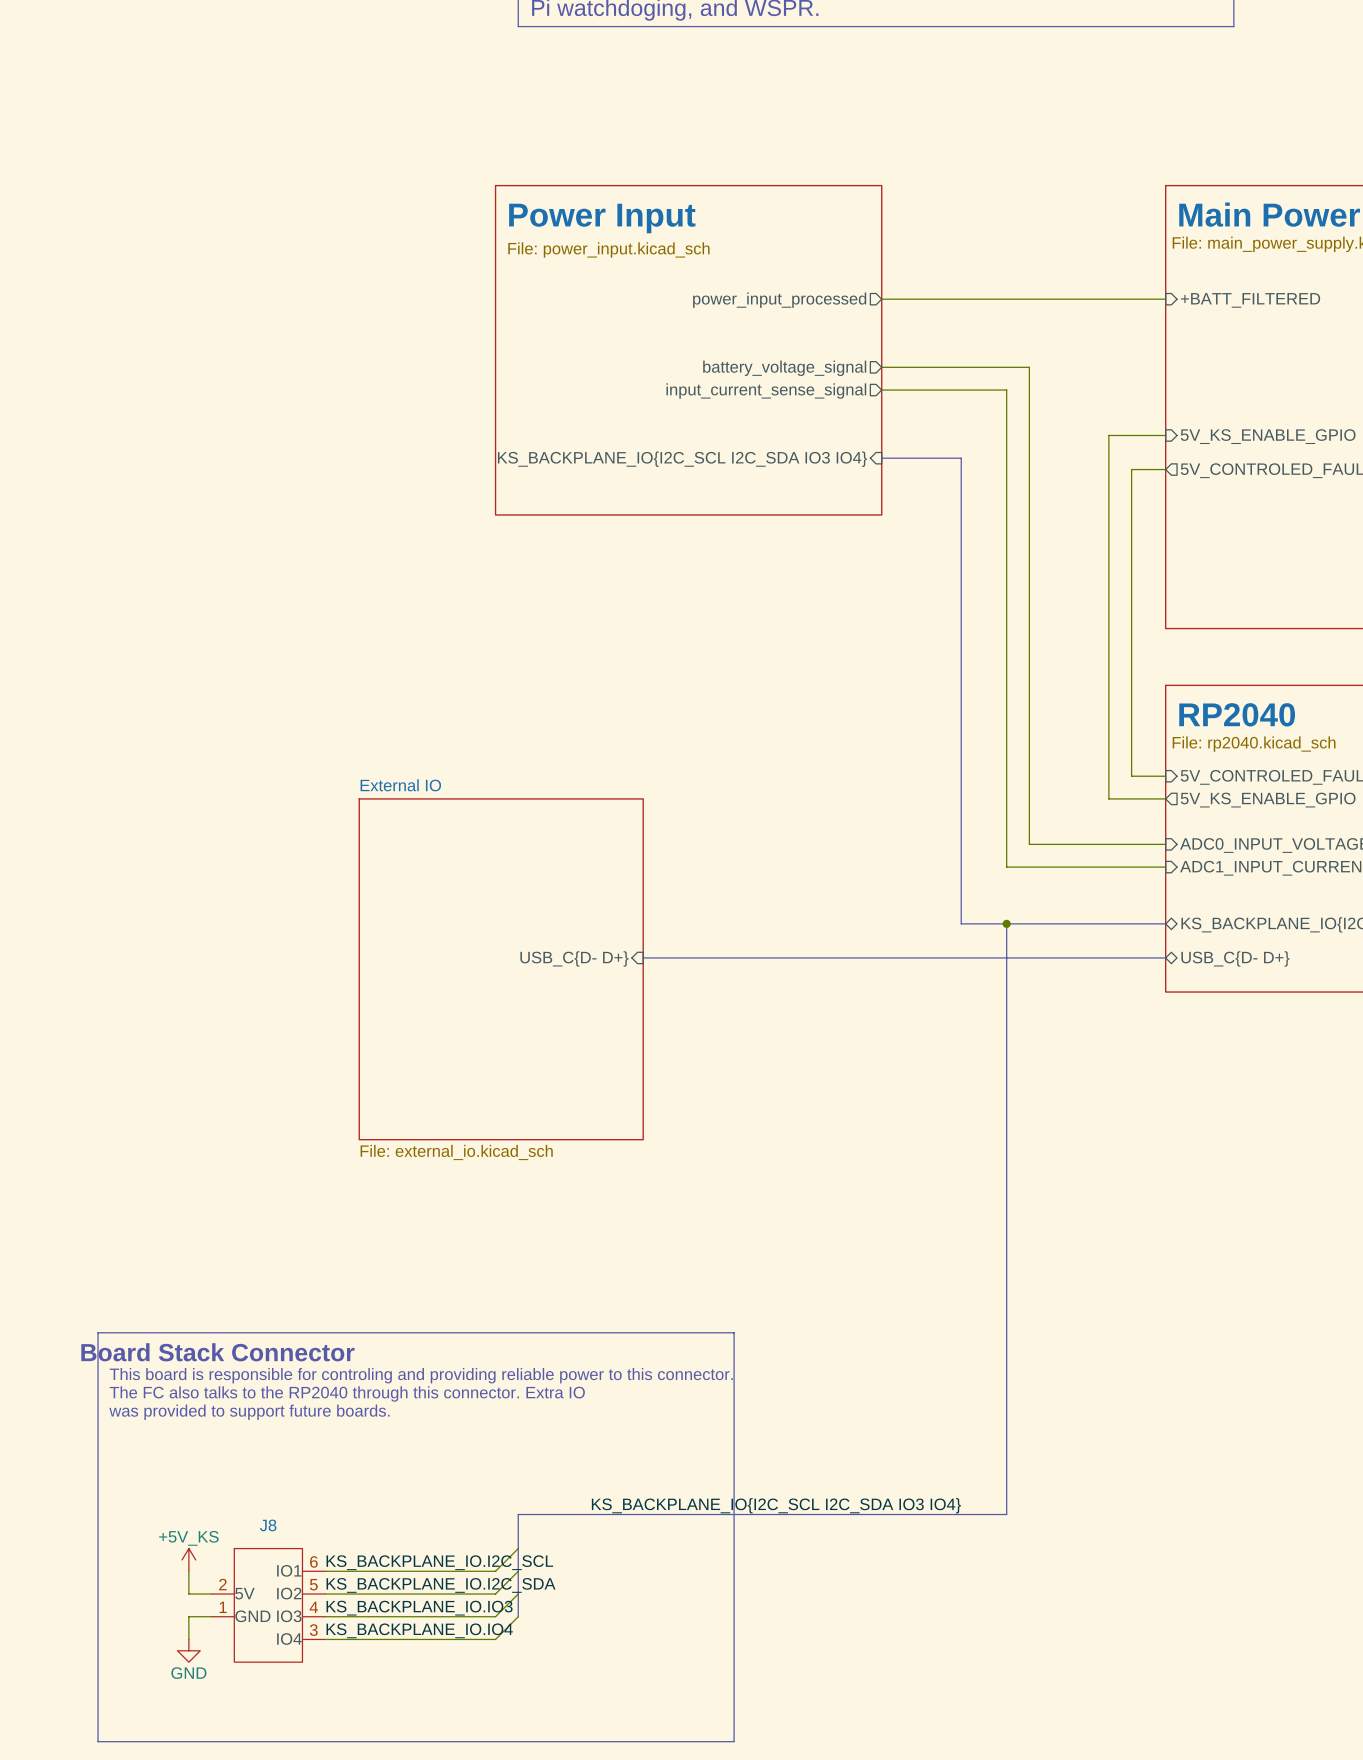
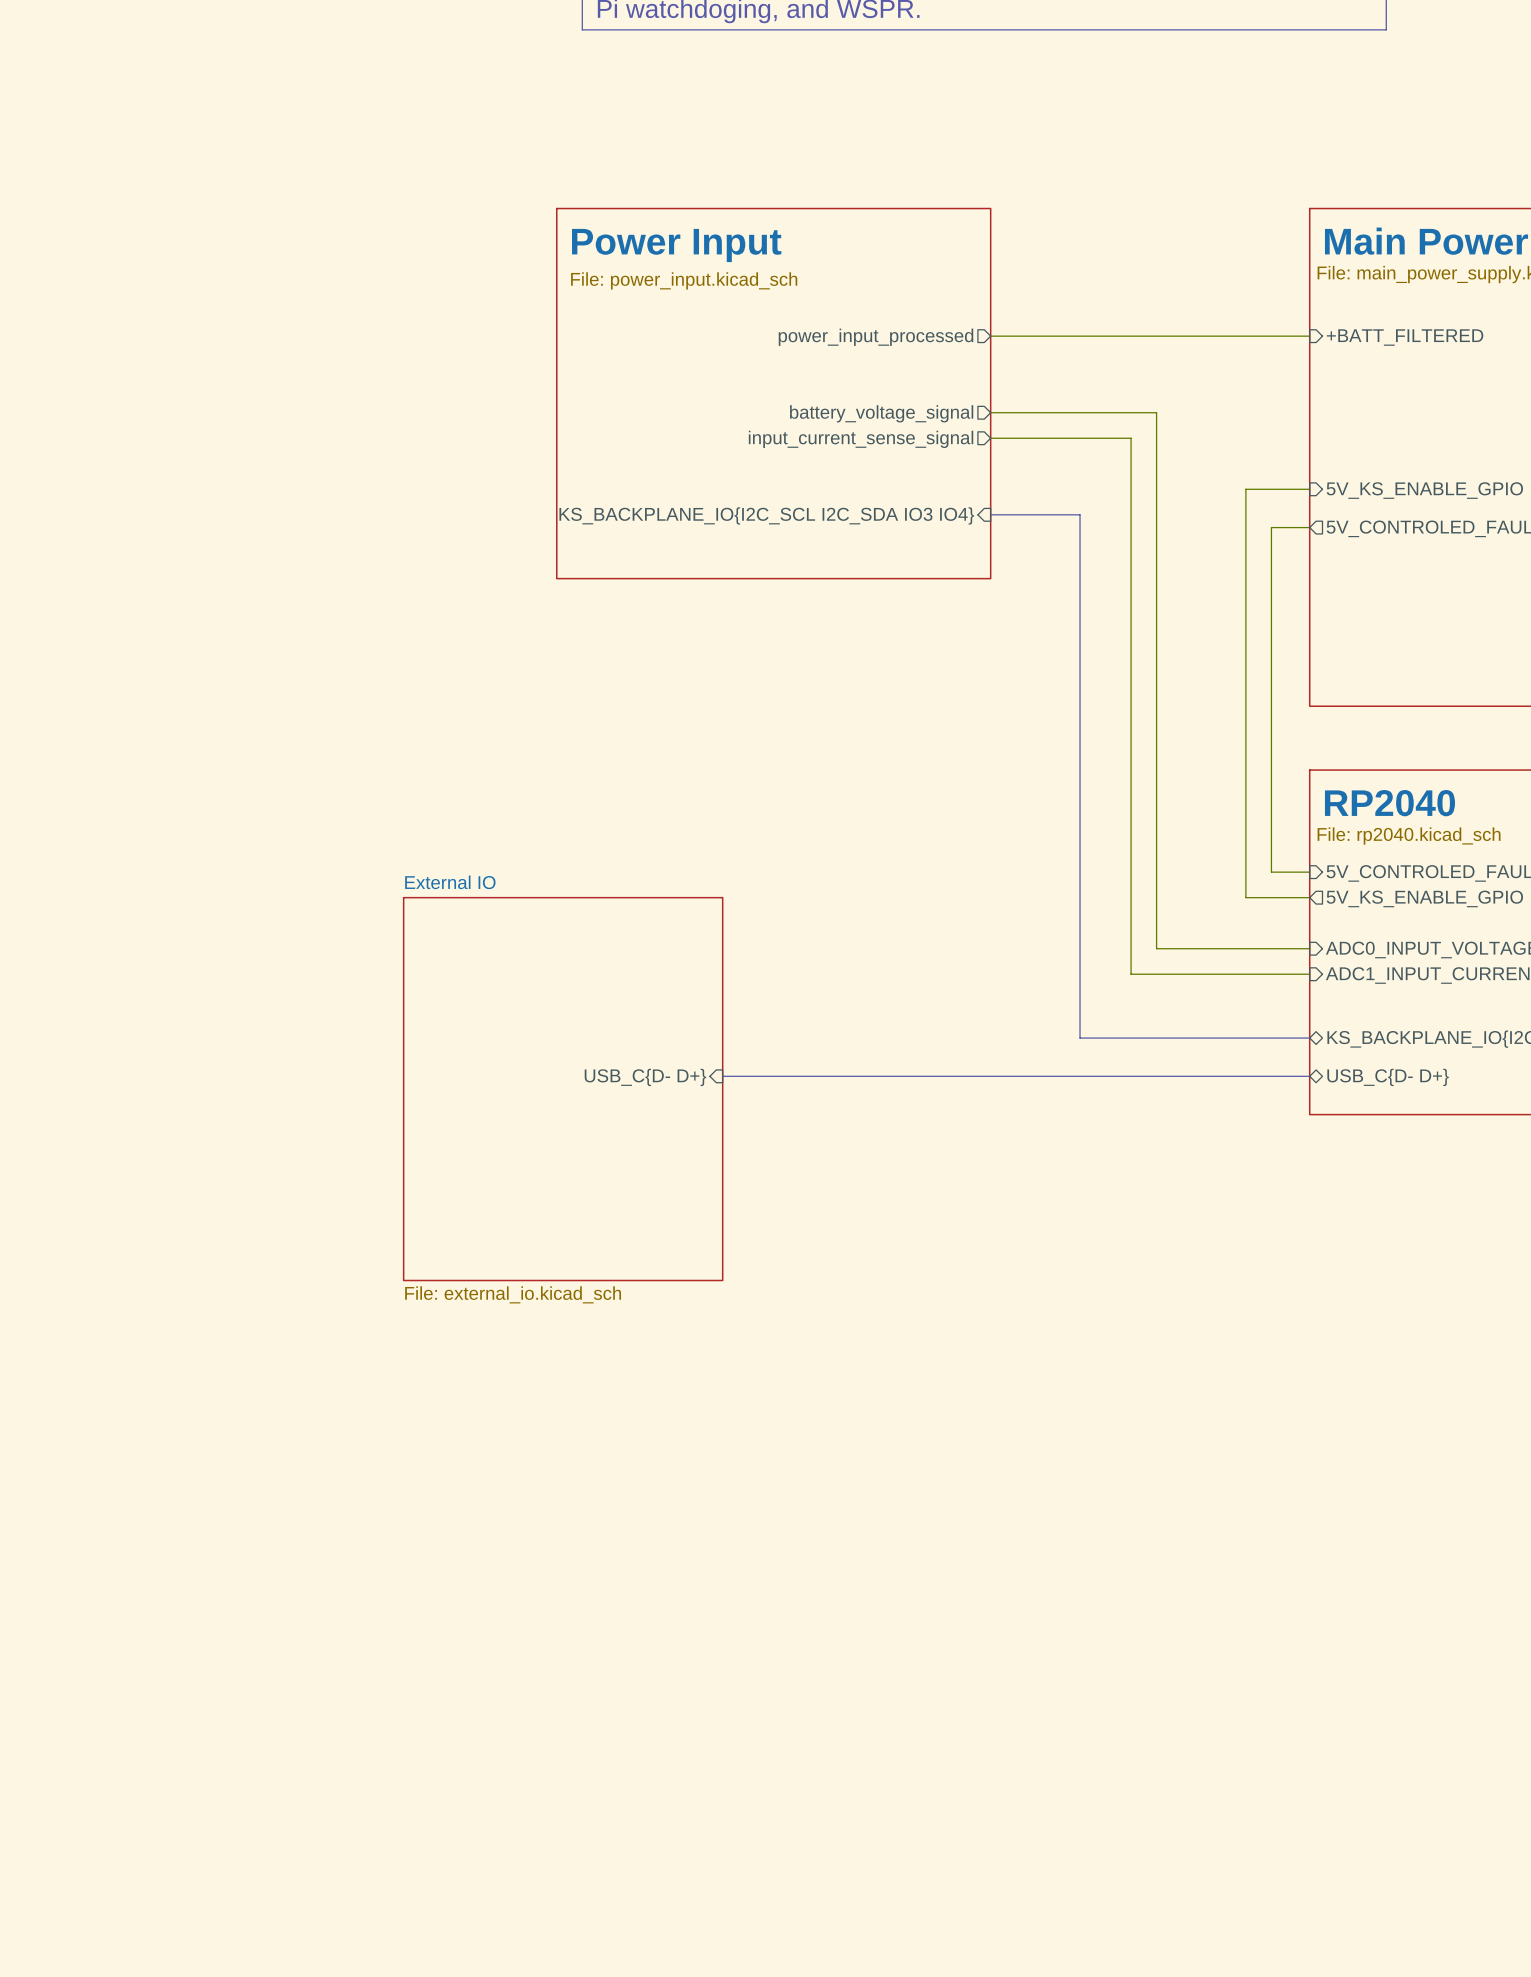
bus: (1006, 923) (1006, 1514) (518, 1514) (518, 1616) -> none
junction: (1006, 923) -> none
line: (98, 1332) (734, 1332) (734, 1741) (98, 1741) (98, 1332) -> none
text: Board Stack Connector (217, 1352) -> none
text: This board is responsible for controling and providing reliable power to this connector. (421, 1375) -> none
text: The FC also talks to the RP2040 through this connector. Extra IO (347, 1393) -> none
text: was provided to support future boards. (249, 1412) -> none
label: KS_BACKPLANE_IO{I2C_SCL I2C_SDA IO3 IO4} (776, 1505) -> none
wire: (518, 1548) (495, 1571) (325, 1571) -> none
power symbol: +5V_KS (188, 1559) -> none
label: KS_BACKPLANE_IO.I2C_SCL (439, 1562) -> none
wire: (188, 1571) (188, 1594) (211, 1594) -> none
wire: (518, 1571) (495, 1594) (325, 1594) -> none
label: KS_BACKPLANE_IO.I2C_SDA (441, 1585) -> none
wire: (518, 1594) (495, 1616) (325, 1616) -> none
J8: (268, 1605) -> none
label: KS_BACKPLANE_IO.IO3 (419, 1608) -> none
wire: (211, 1616) (188, 1616) (188, 1639) -> none
wire: (518, 1616) (495, 1639) (325, 1639) -> none
label: KS_BACKPLANE_IO.IO4 (419, 1630) -> none
power symbol: GND (188, 1650) -> none

